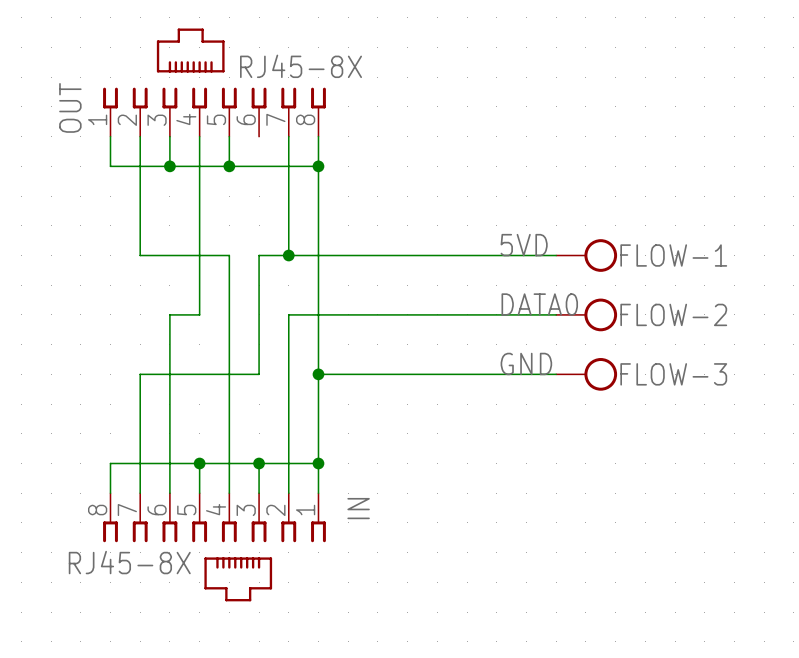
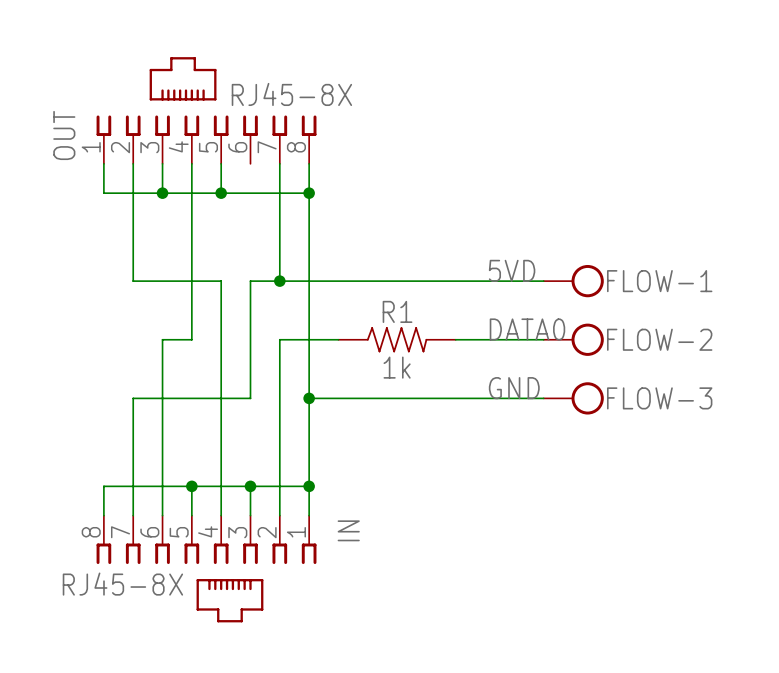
R1: none -> 1k (397, 339)

